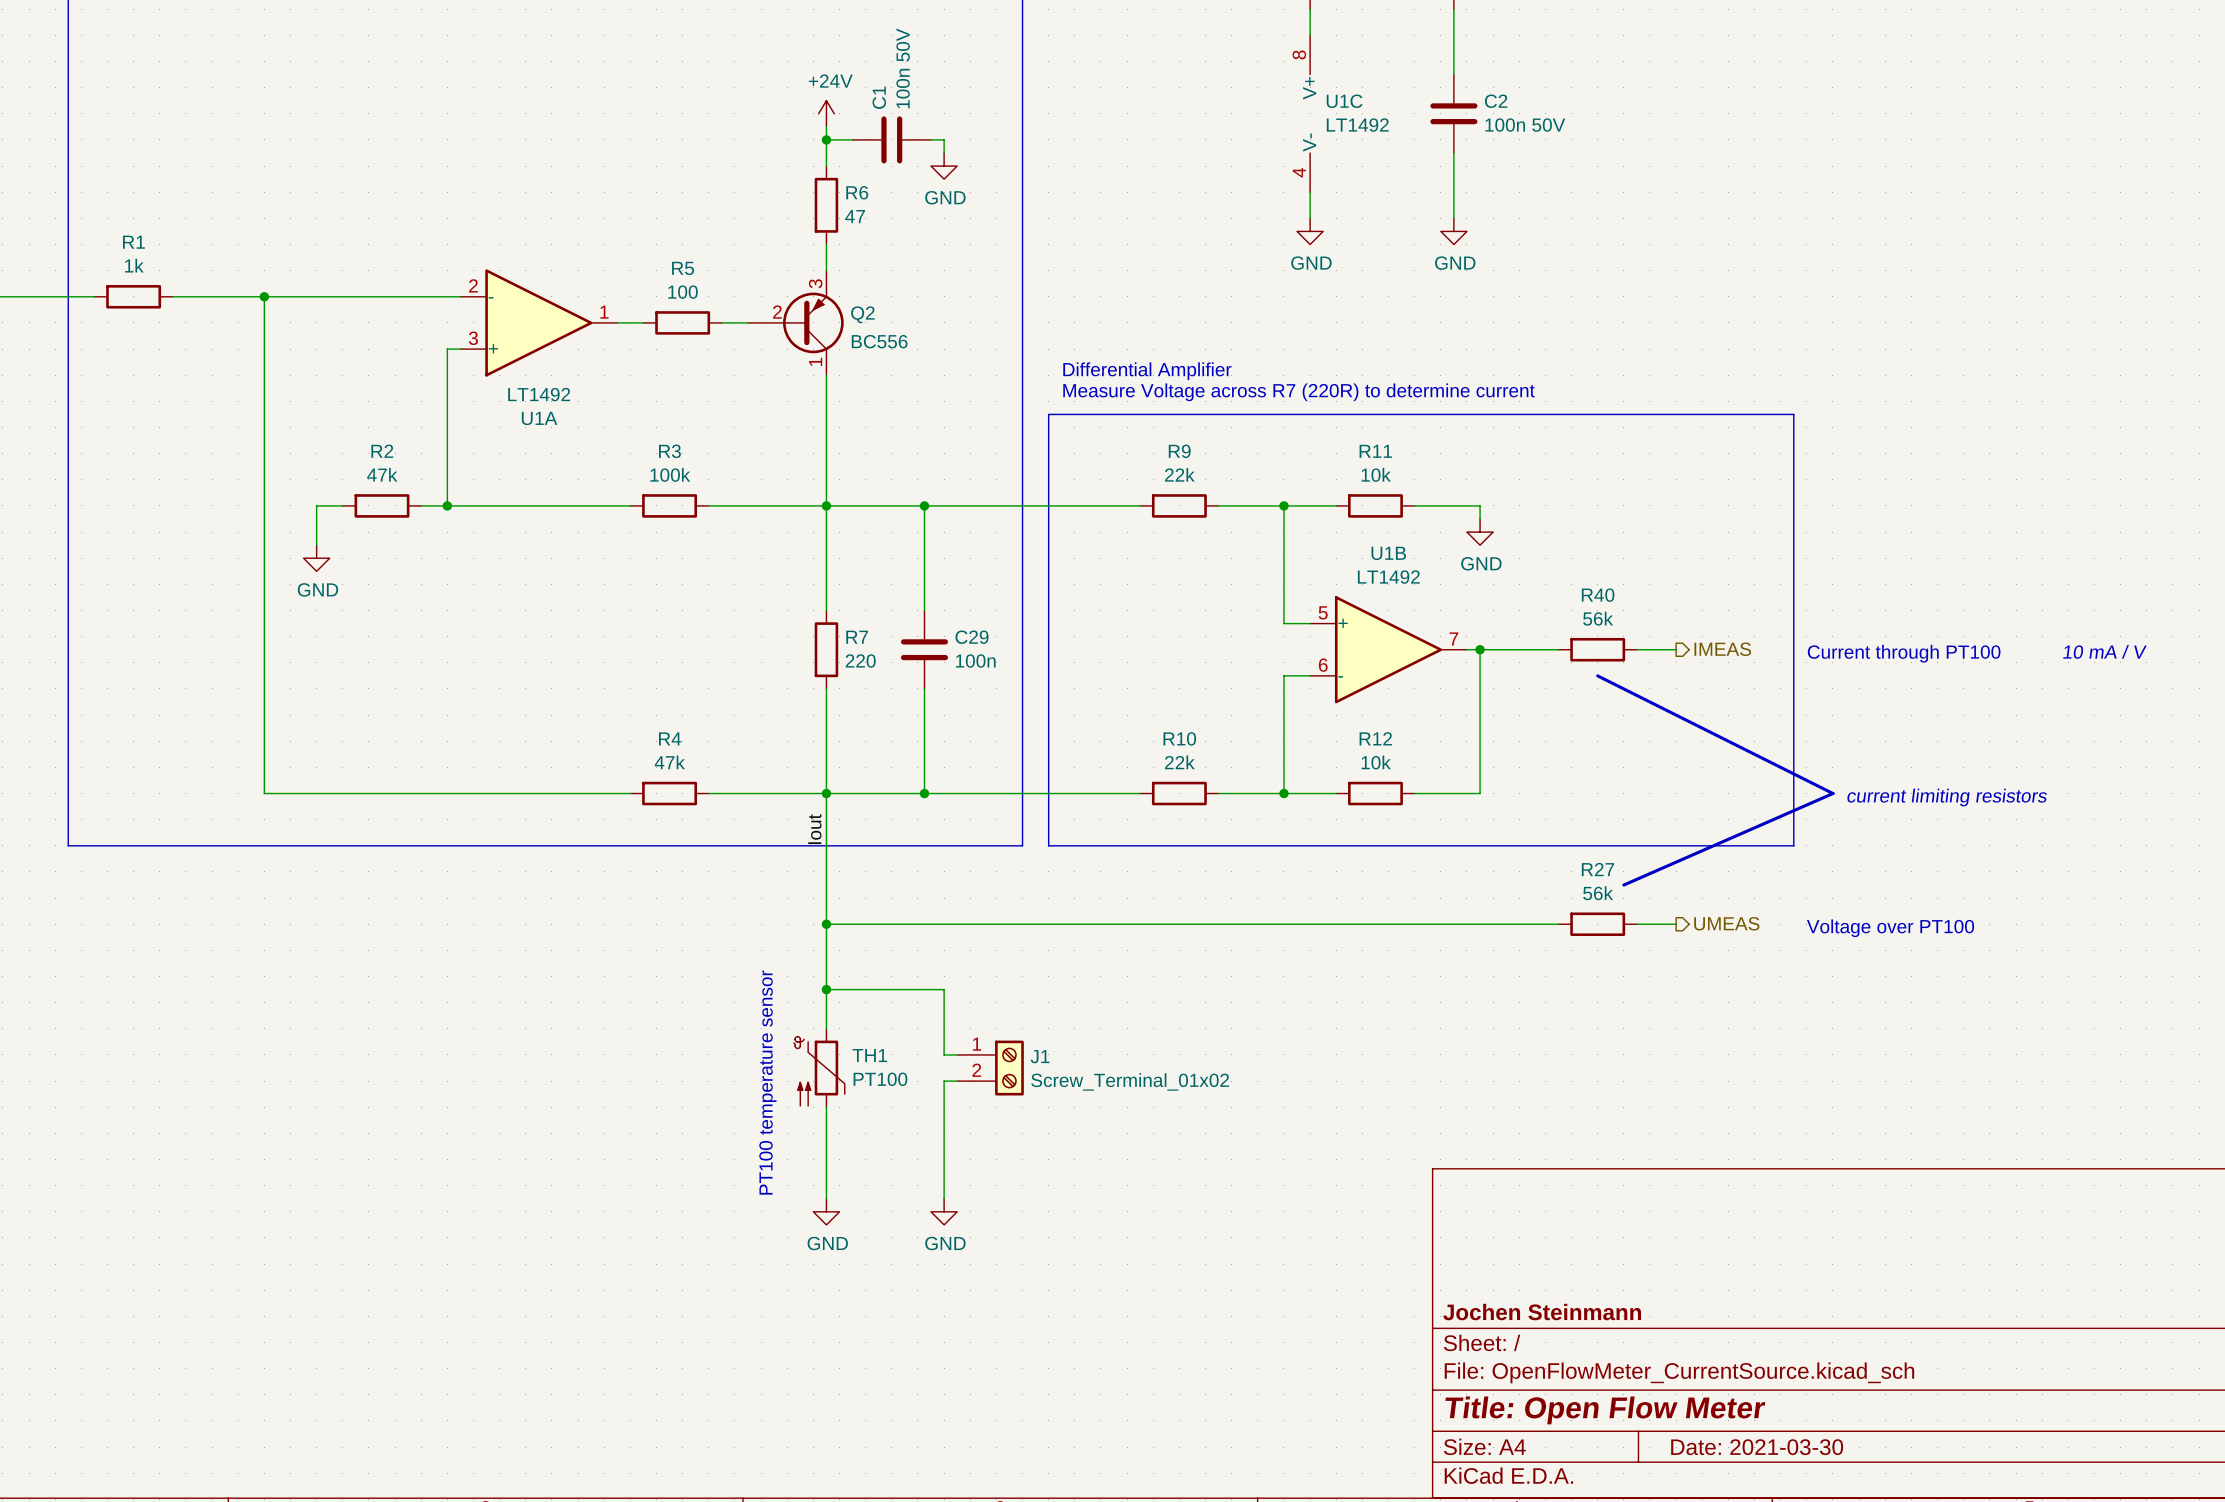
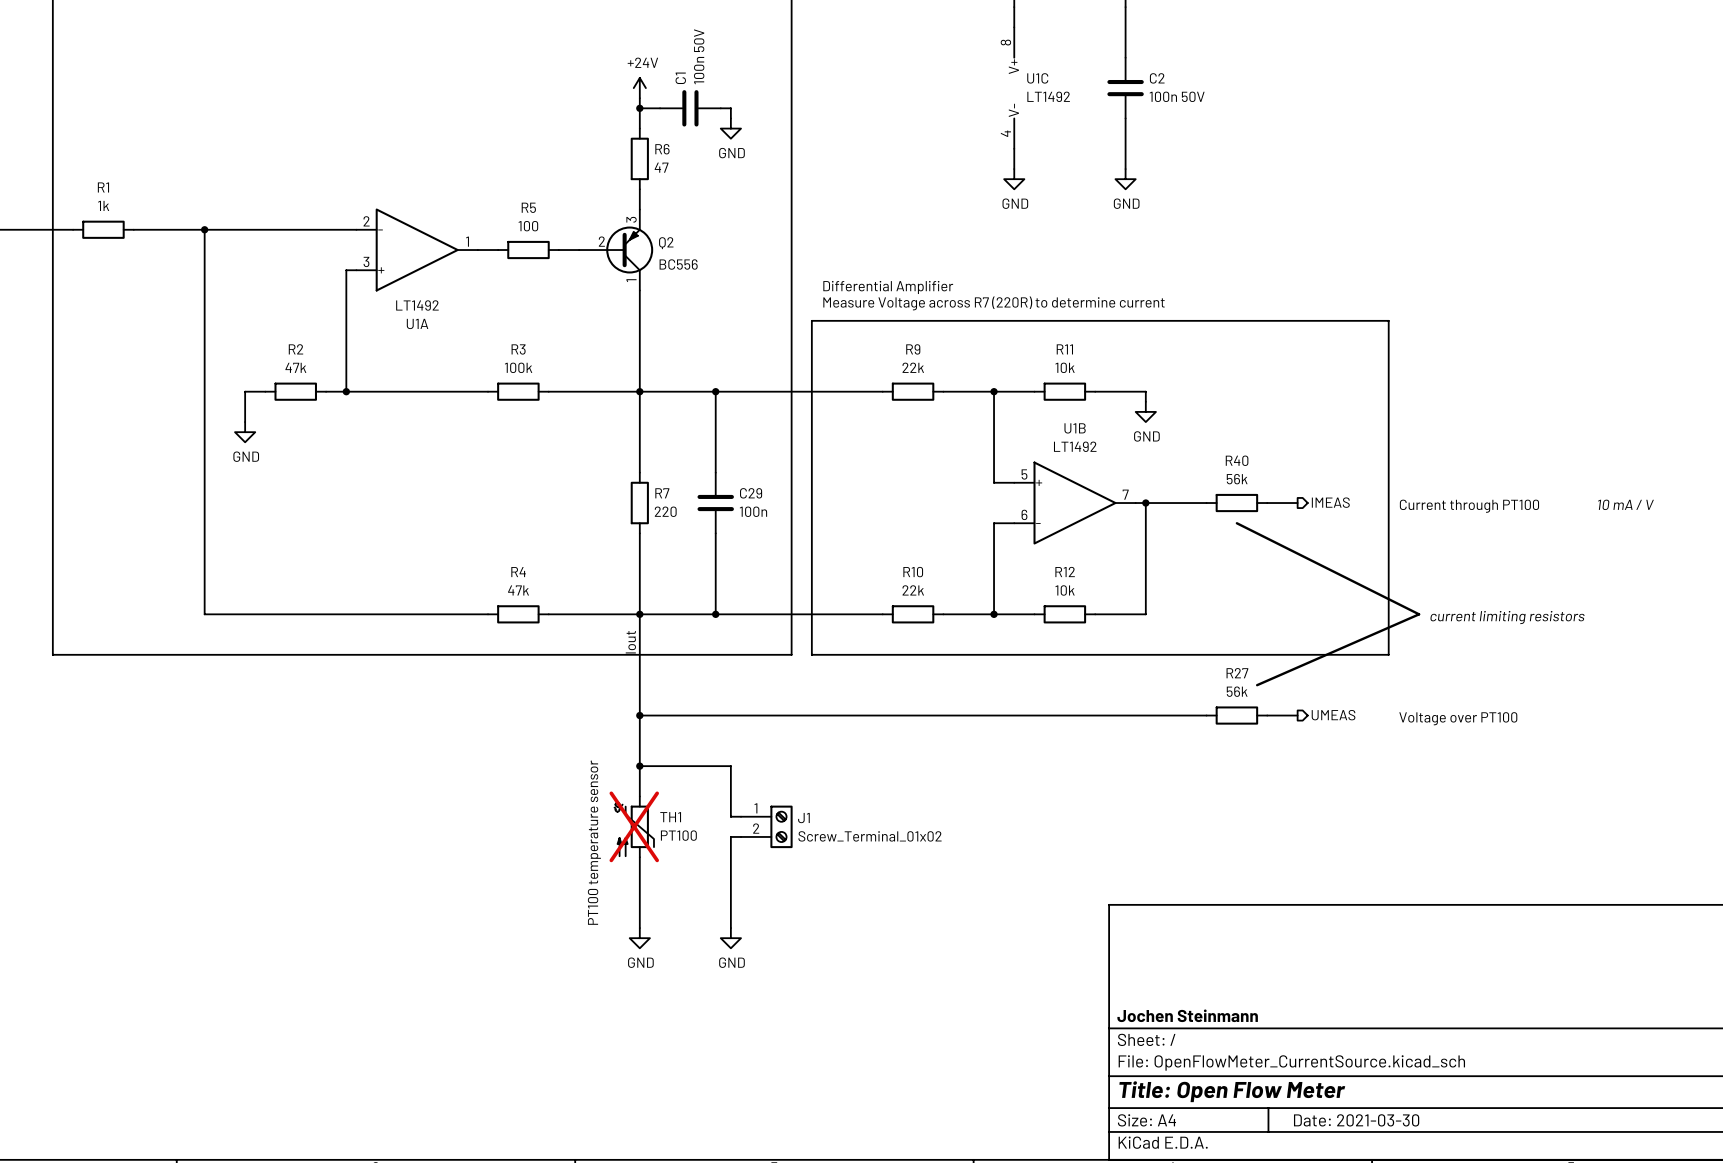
TH1 do-not-place cross: none -> (634, 826)

